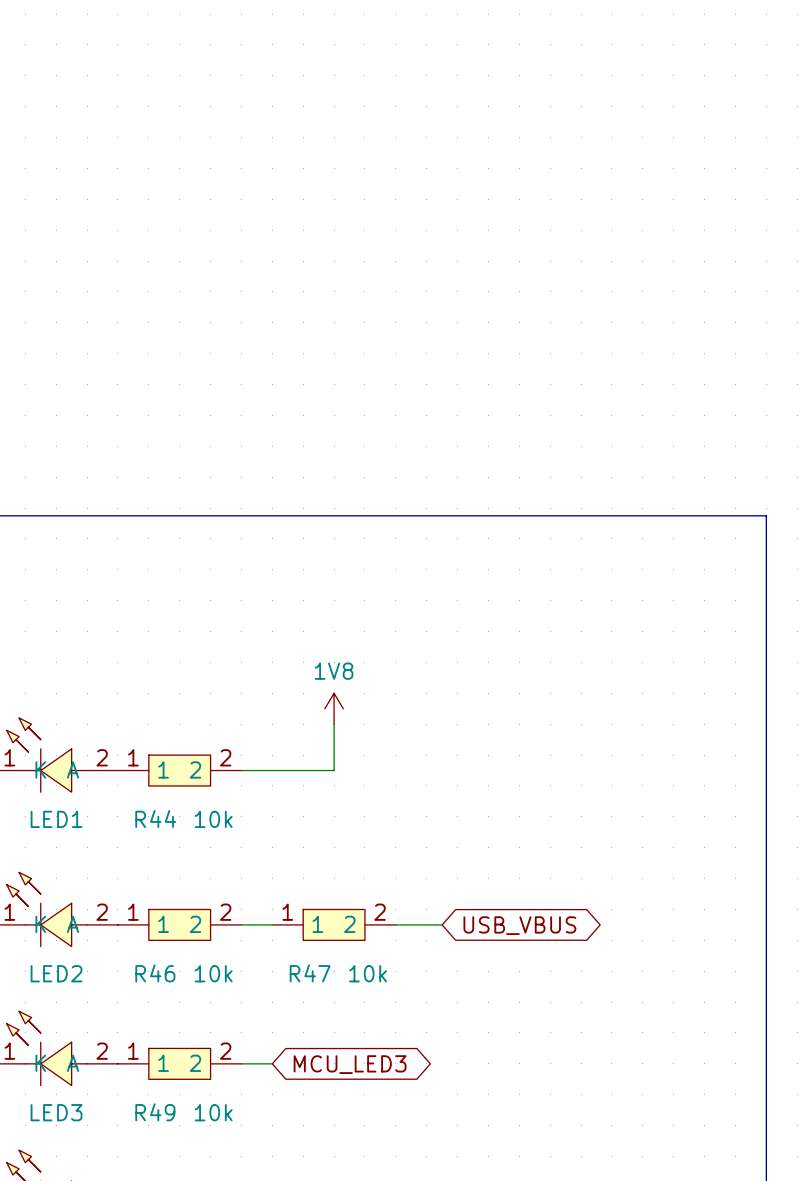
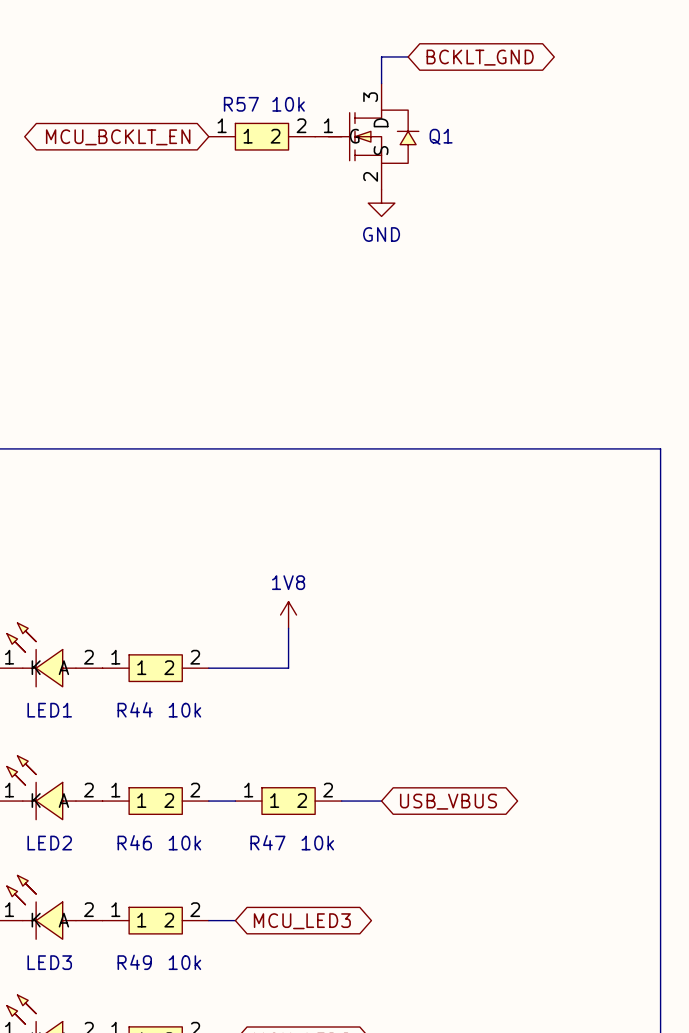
wire: none -> (408, 56) (381, 56) (381, 83)
global label: none -> BCKLT_GND (480, 57)
global label: none -> MCU_BCKLT_EN (118, 137)
R57: none -> (261, 136)
Q1: none -> (366, 136)
power symbol: none -> GND (381, 203)

